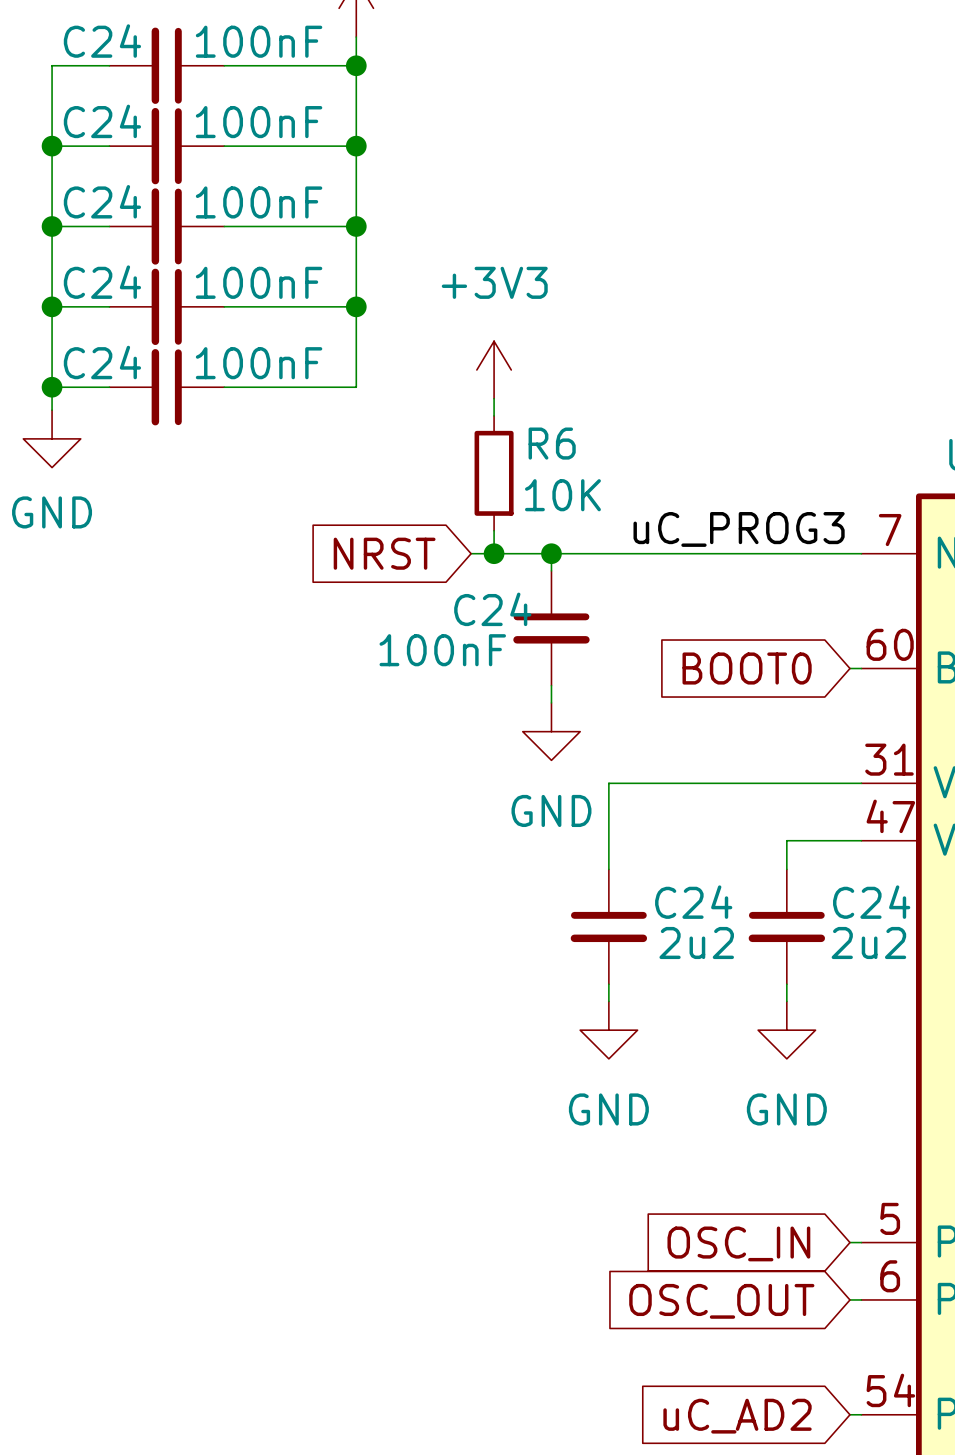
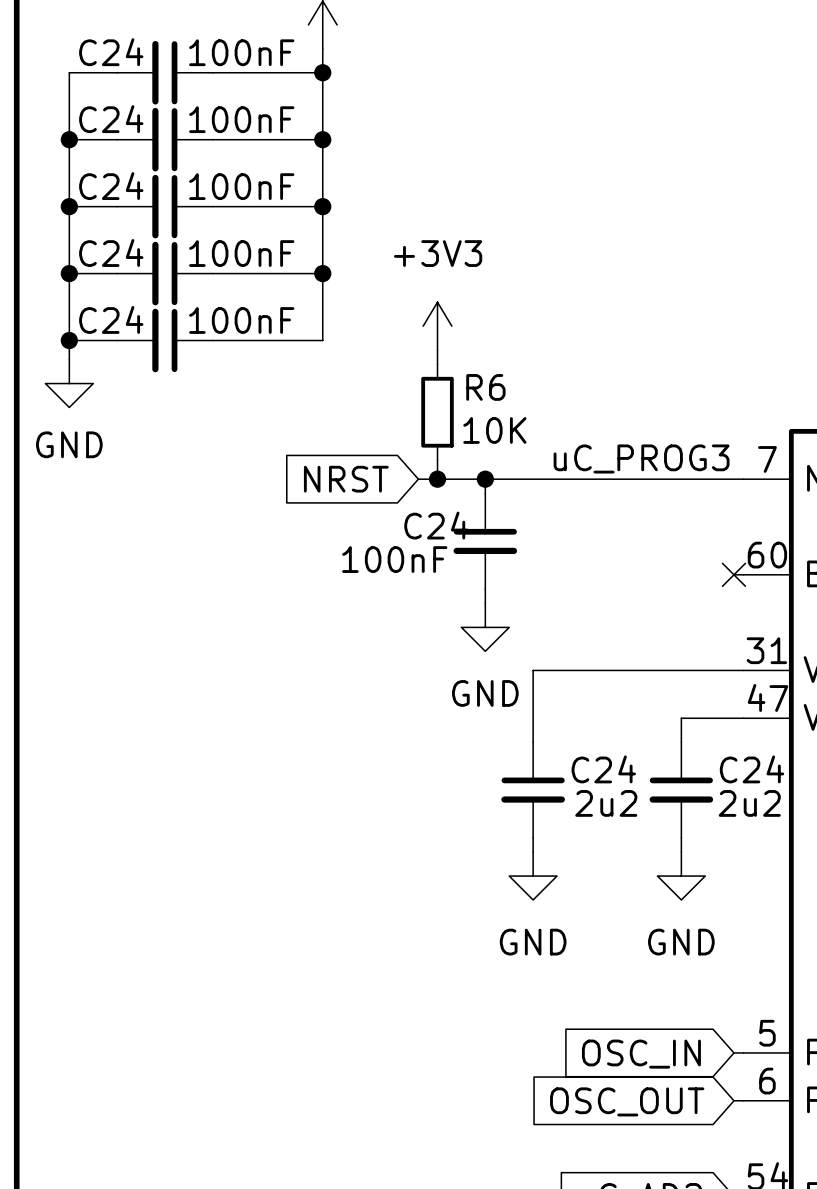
global label: BOOT0 (747, 668) -> none
no-connect mark: none -> (733, 574)

